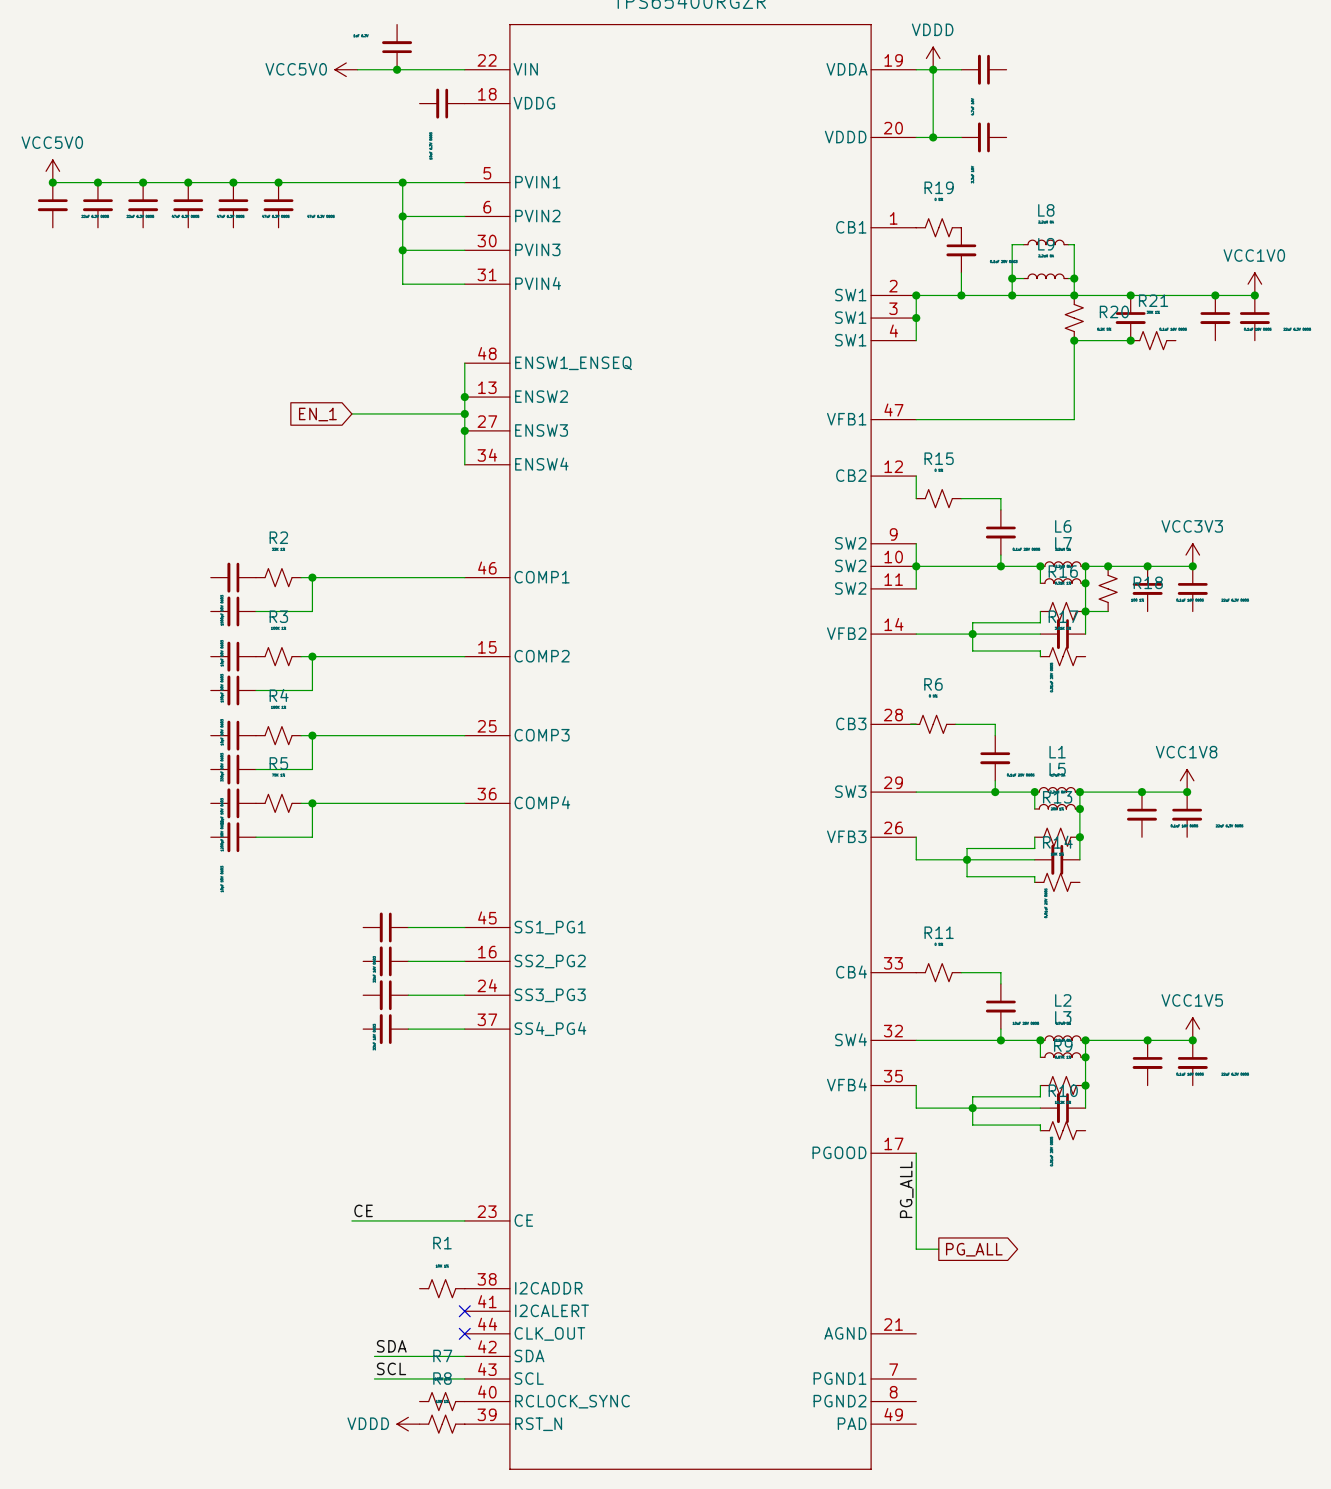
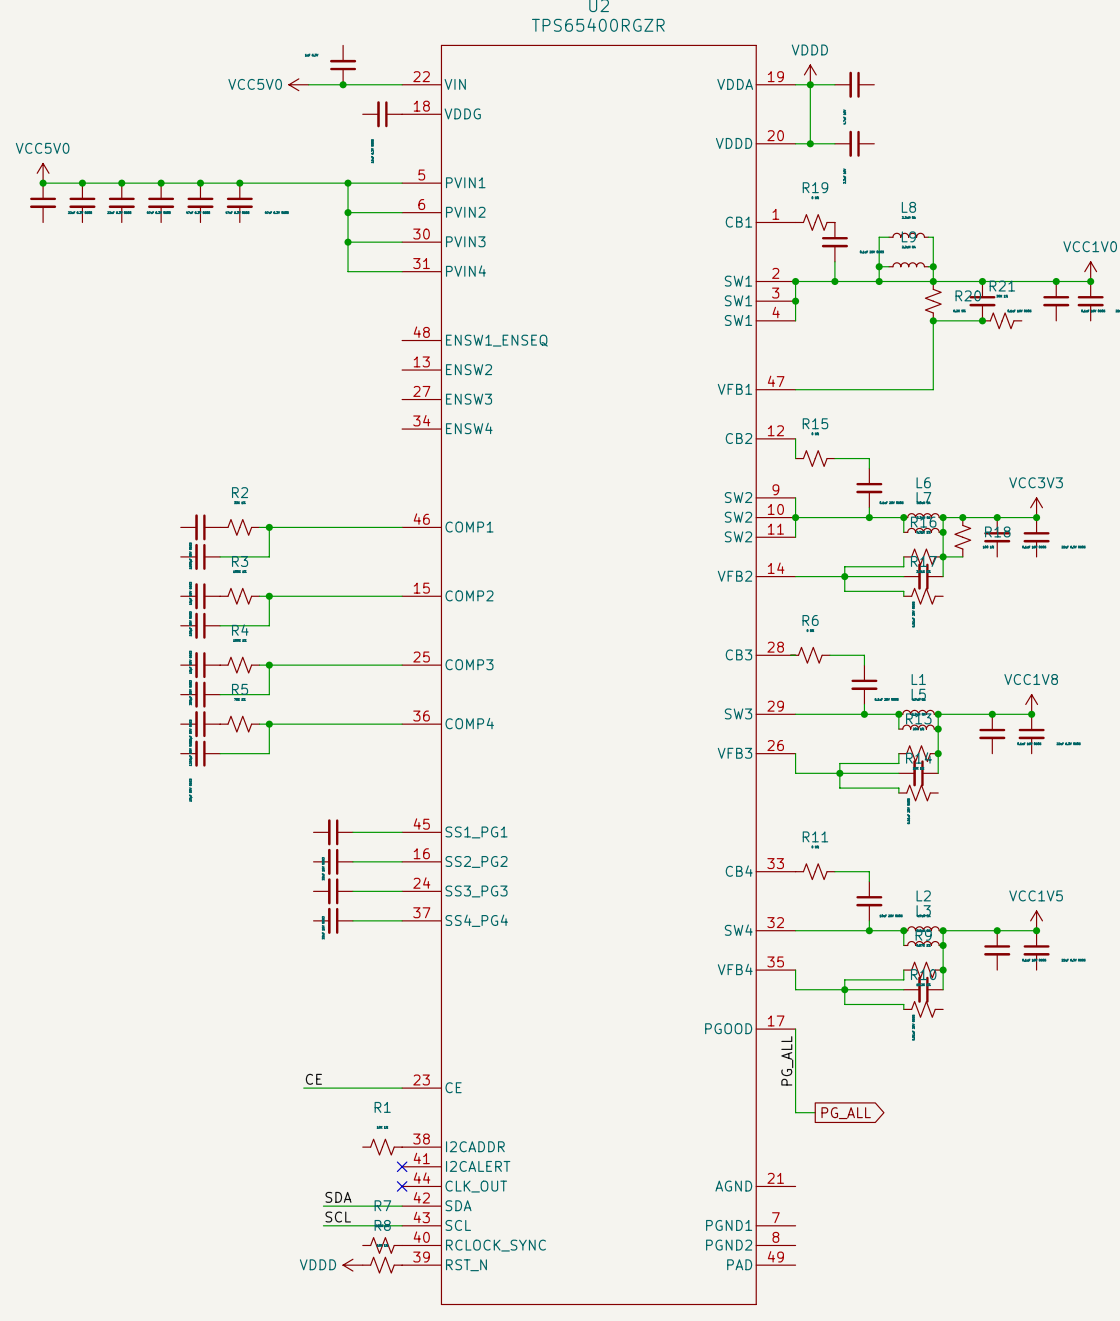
wire: (464, 363) (464, 464) -> none
junction: (464, 397) -> none
wire: (351, 413) (464, 413) -> none
junction: (464, 413) -> none
global label: EN_1 (317, 414) -> none
junction: (464, 430) -> none

